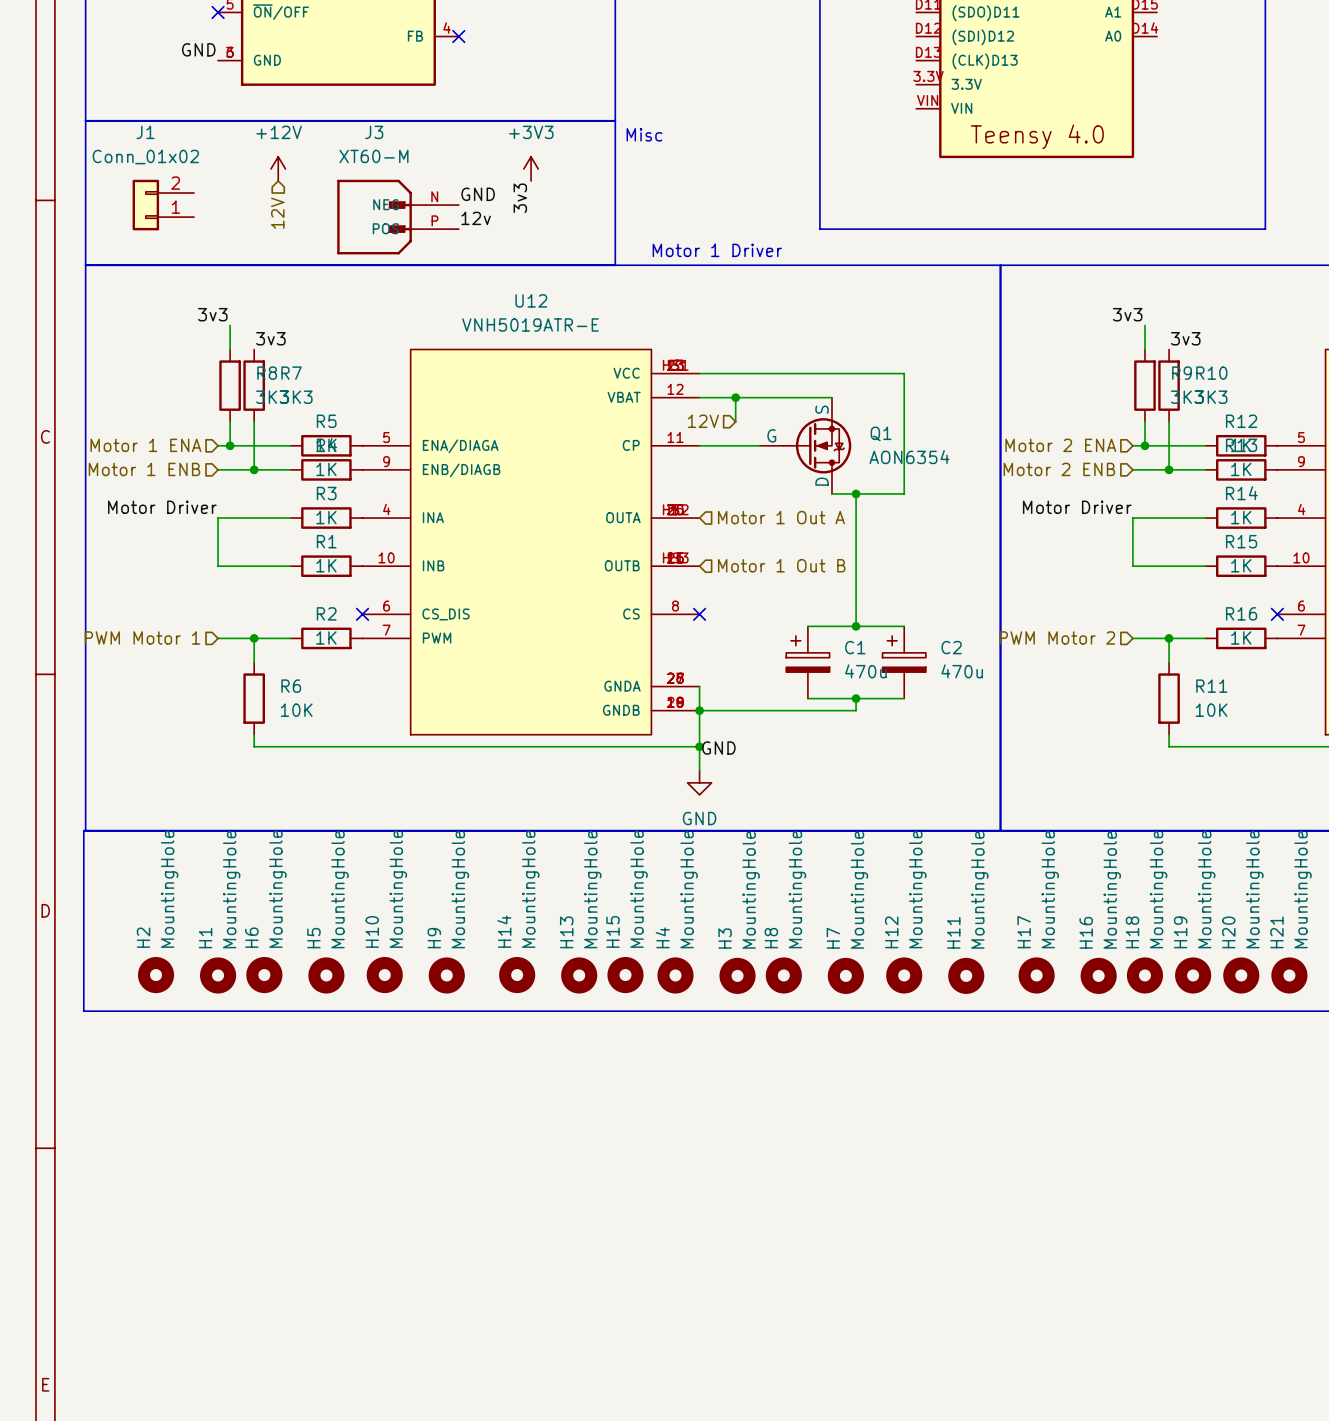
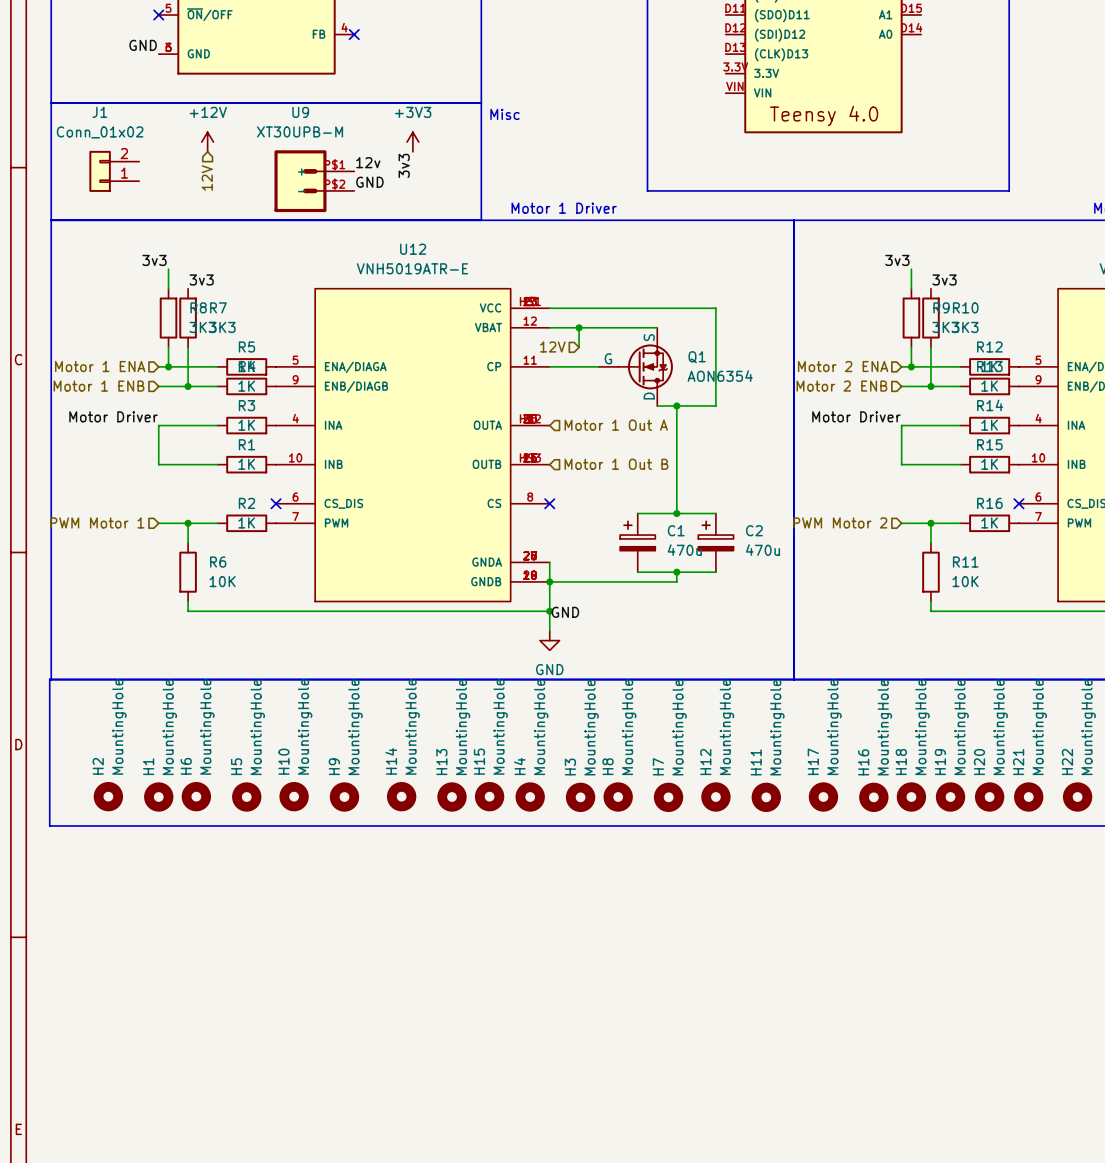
label: GND (478, 194) -> 12v (368, 162)
J3: XT60-M (398, 217) -> none
U9: none -> XT30UPB-M (314, 181)
label: 12v (476, 218) -> GND (369, 182)

